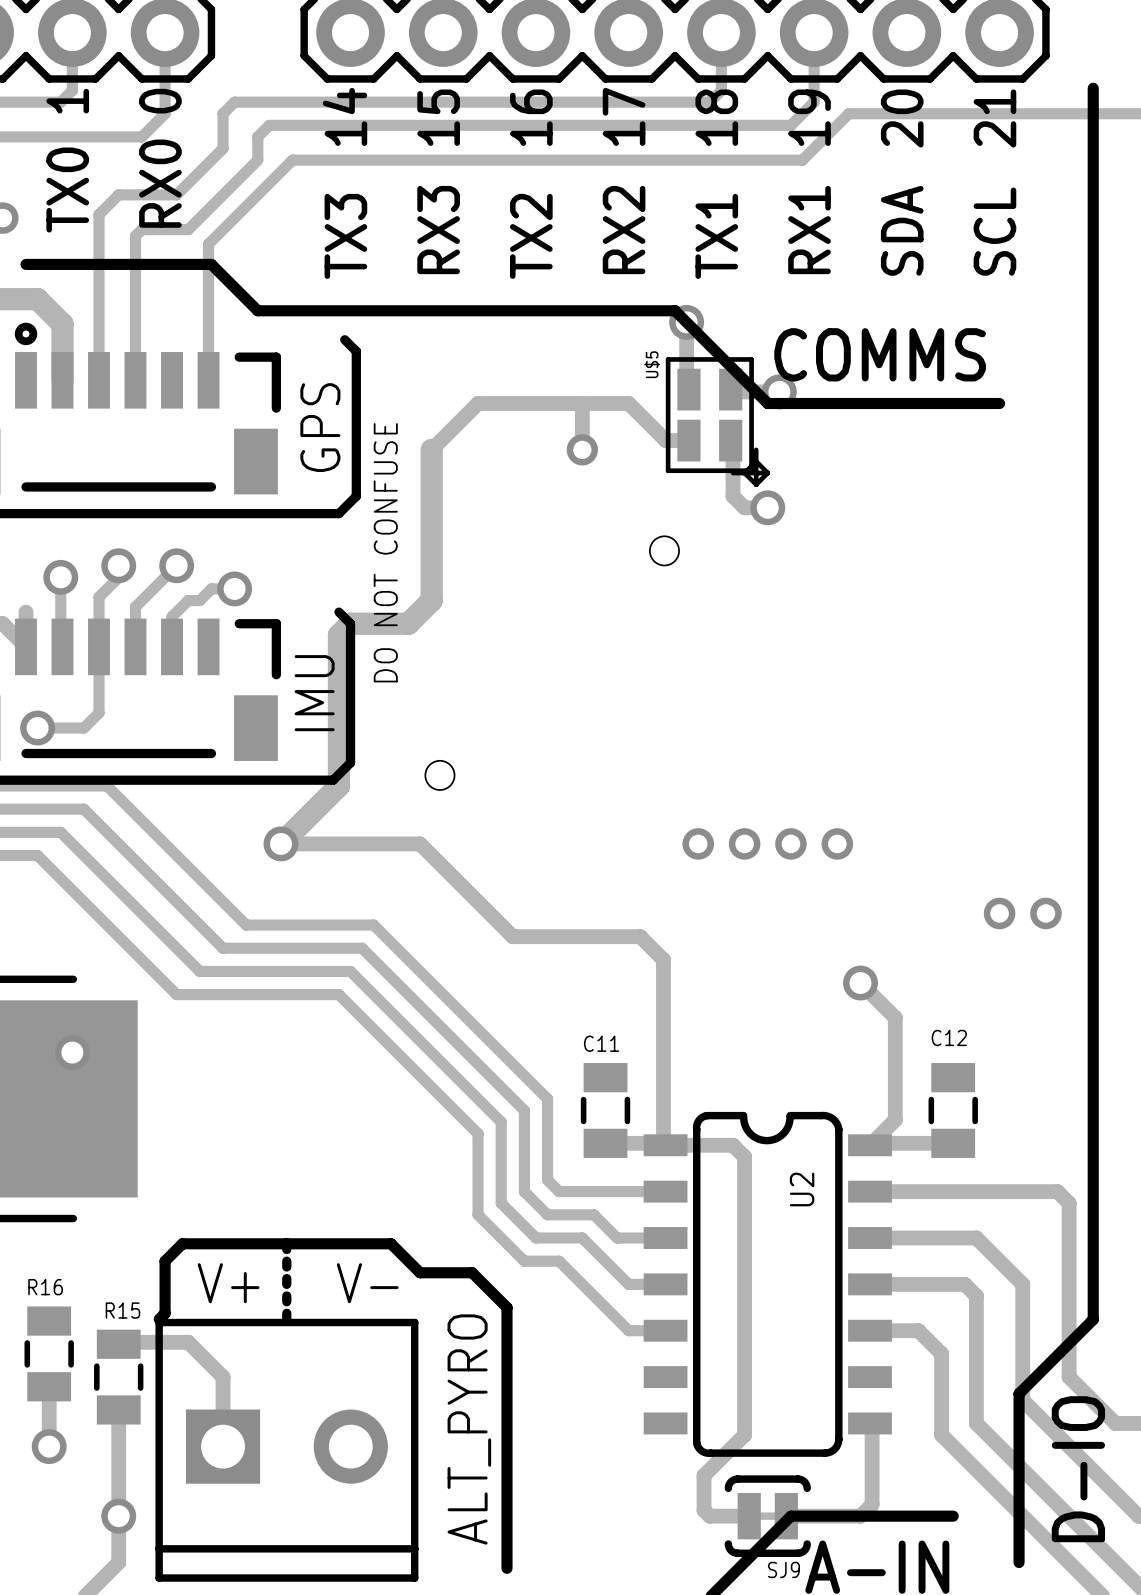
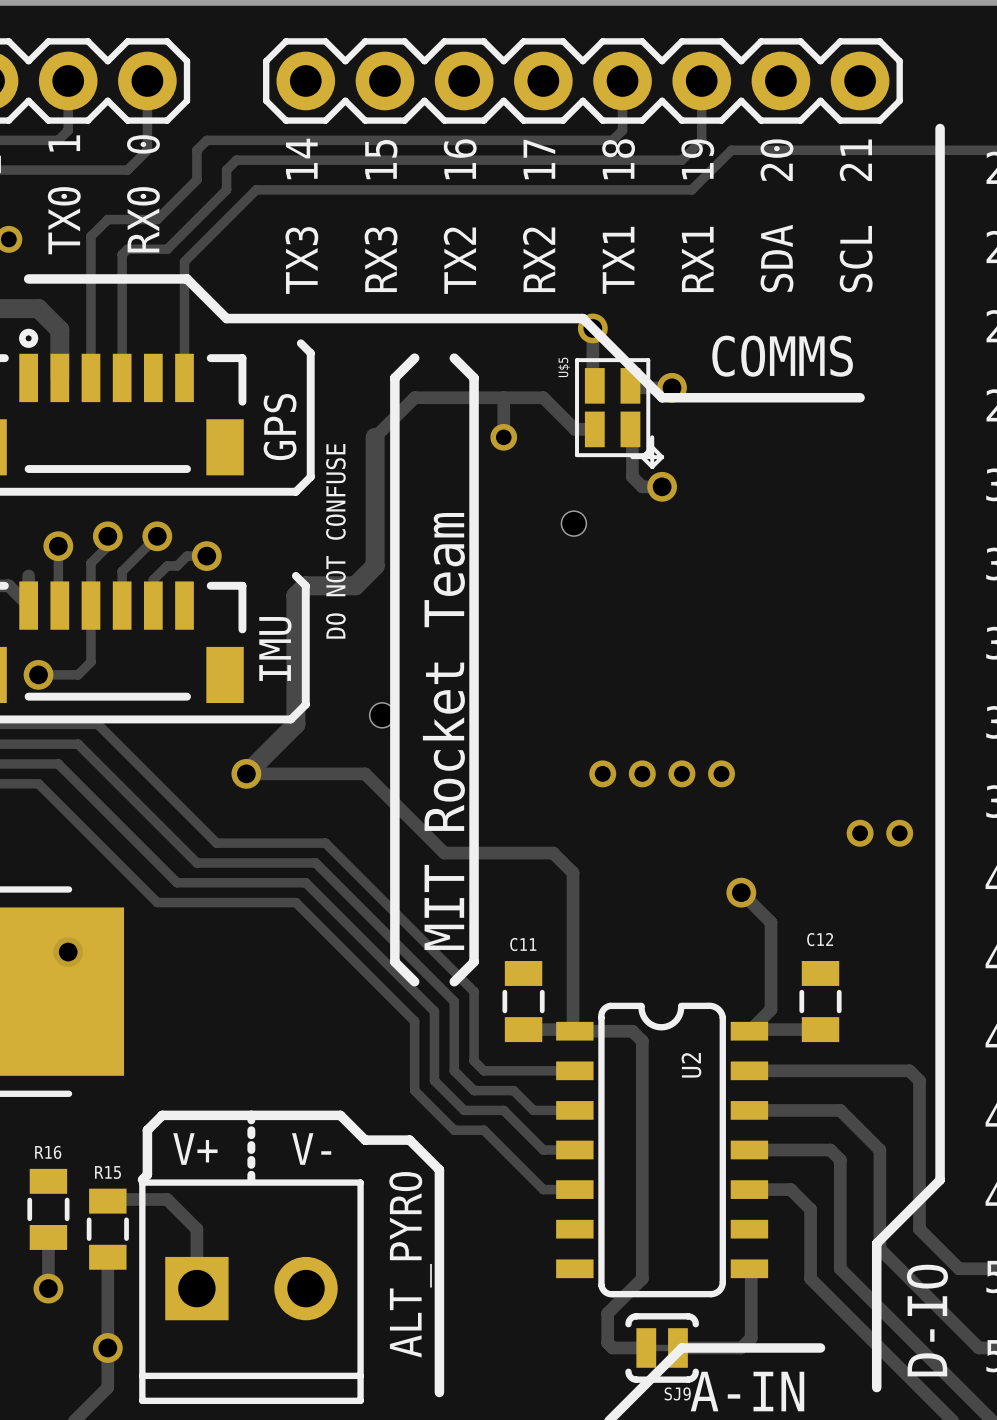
line: none -> (414, 358) (394, 377) (394, 961) (414, 981)
line: none -> (454, 358) (474, 377) (474, 961) (454, 981)
text: none -> MIT Rocket Team (443, 731)

